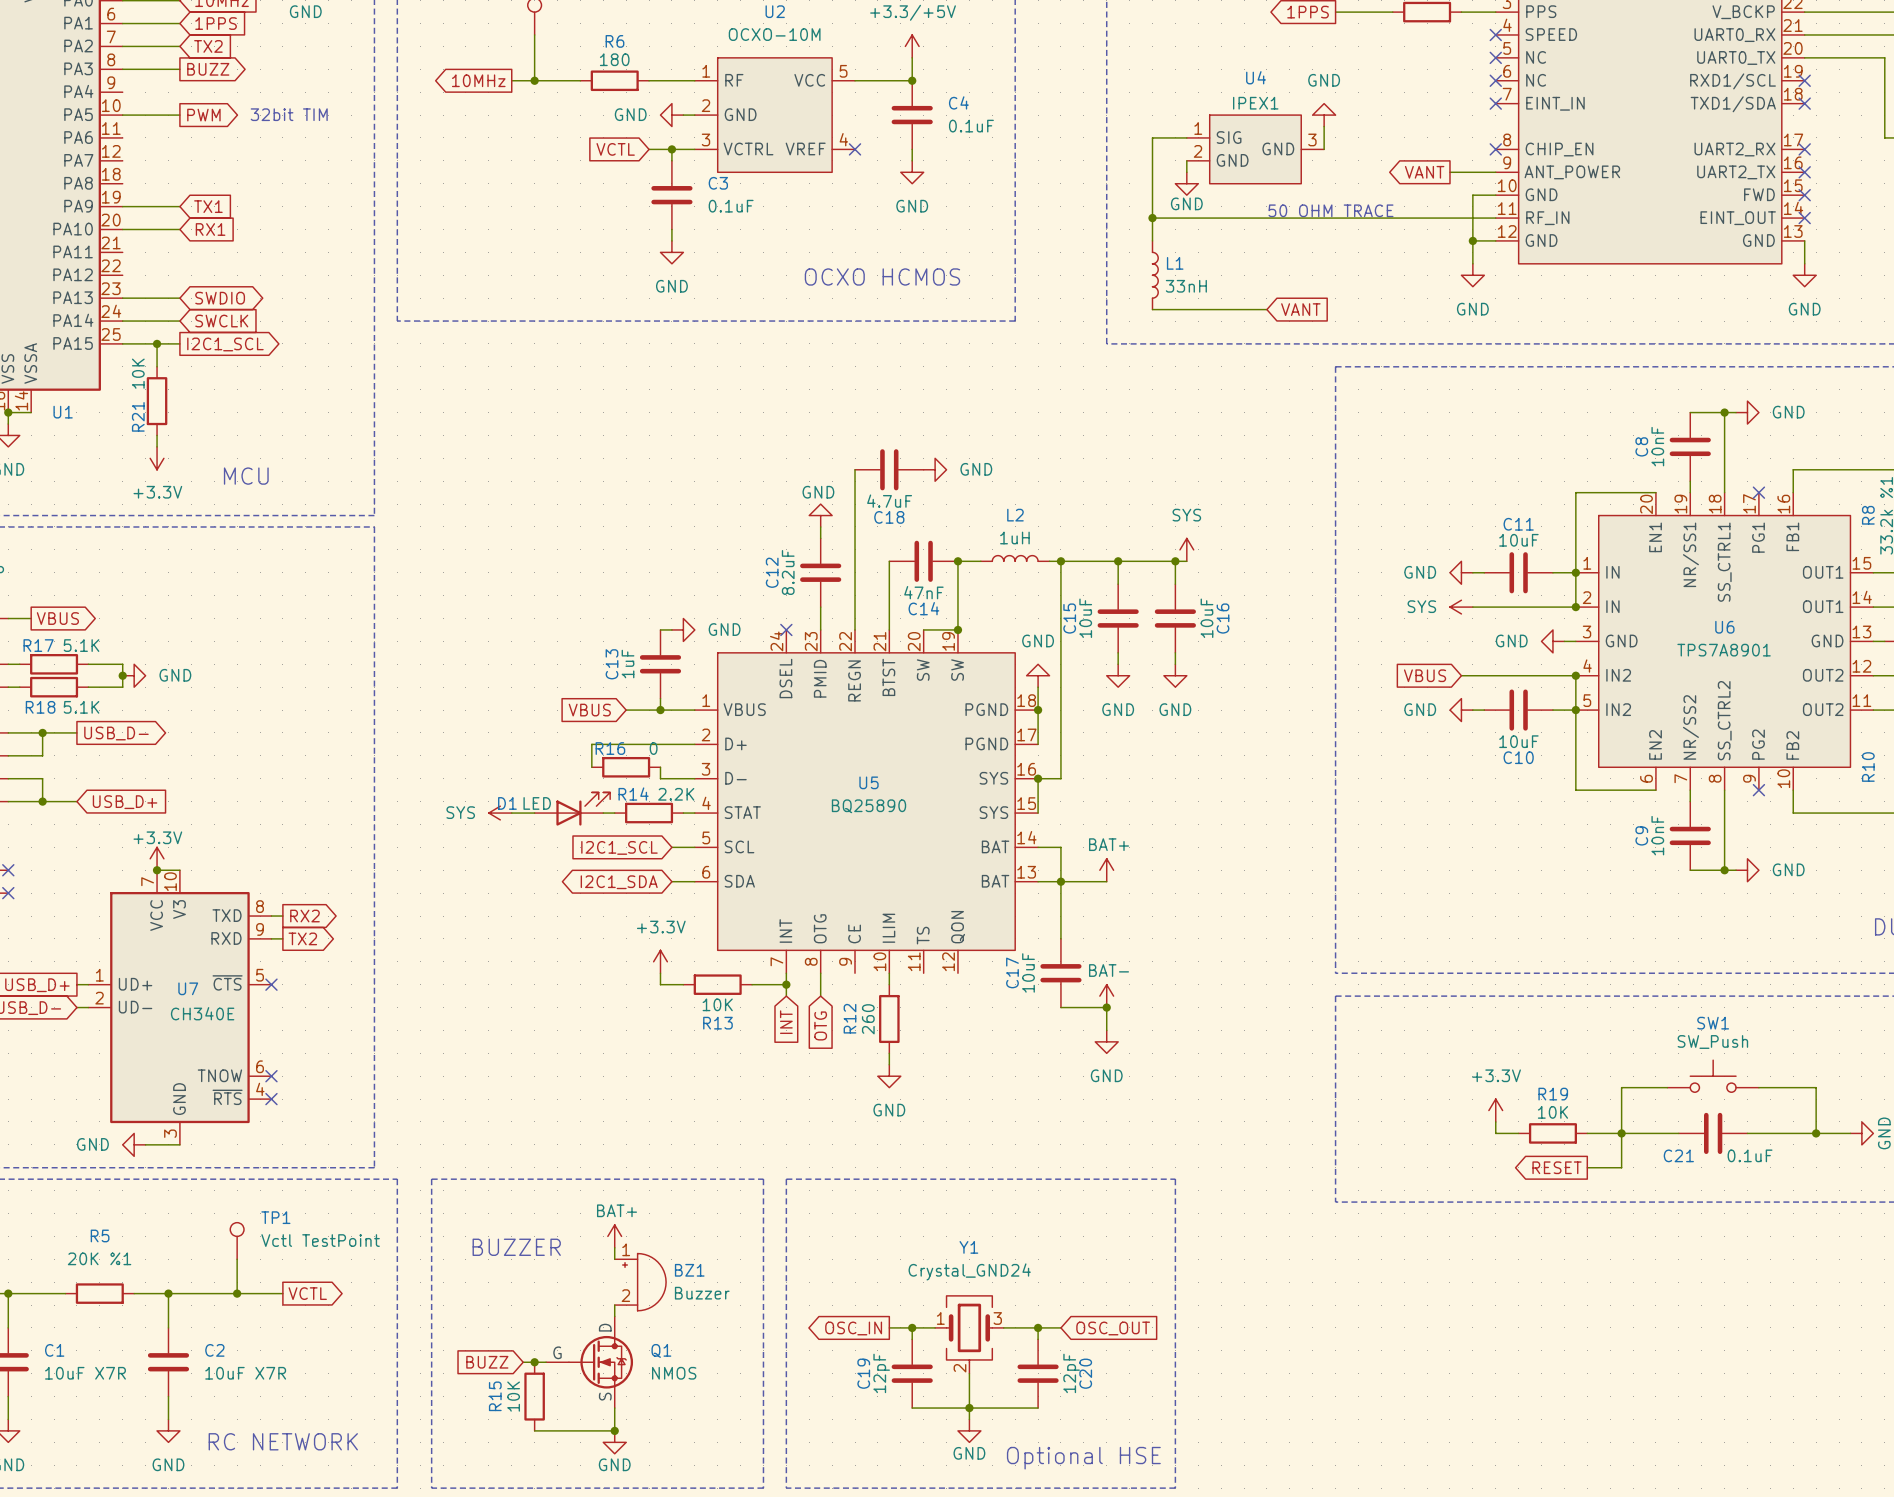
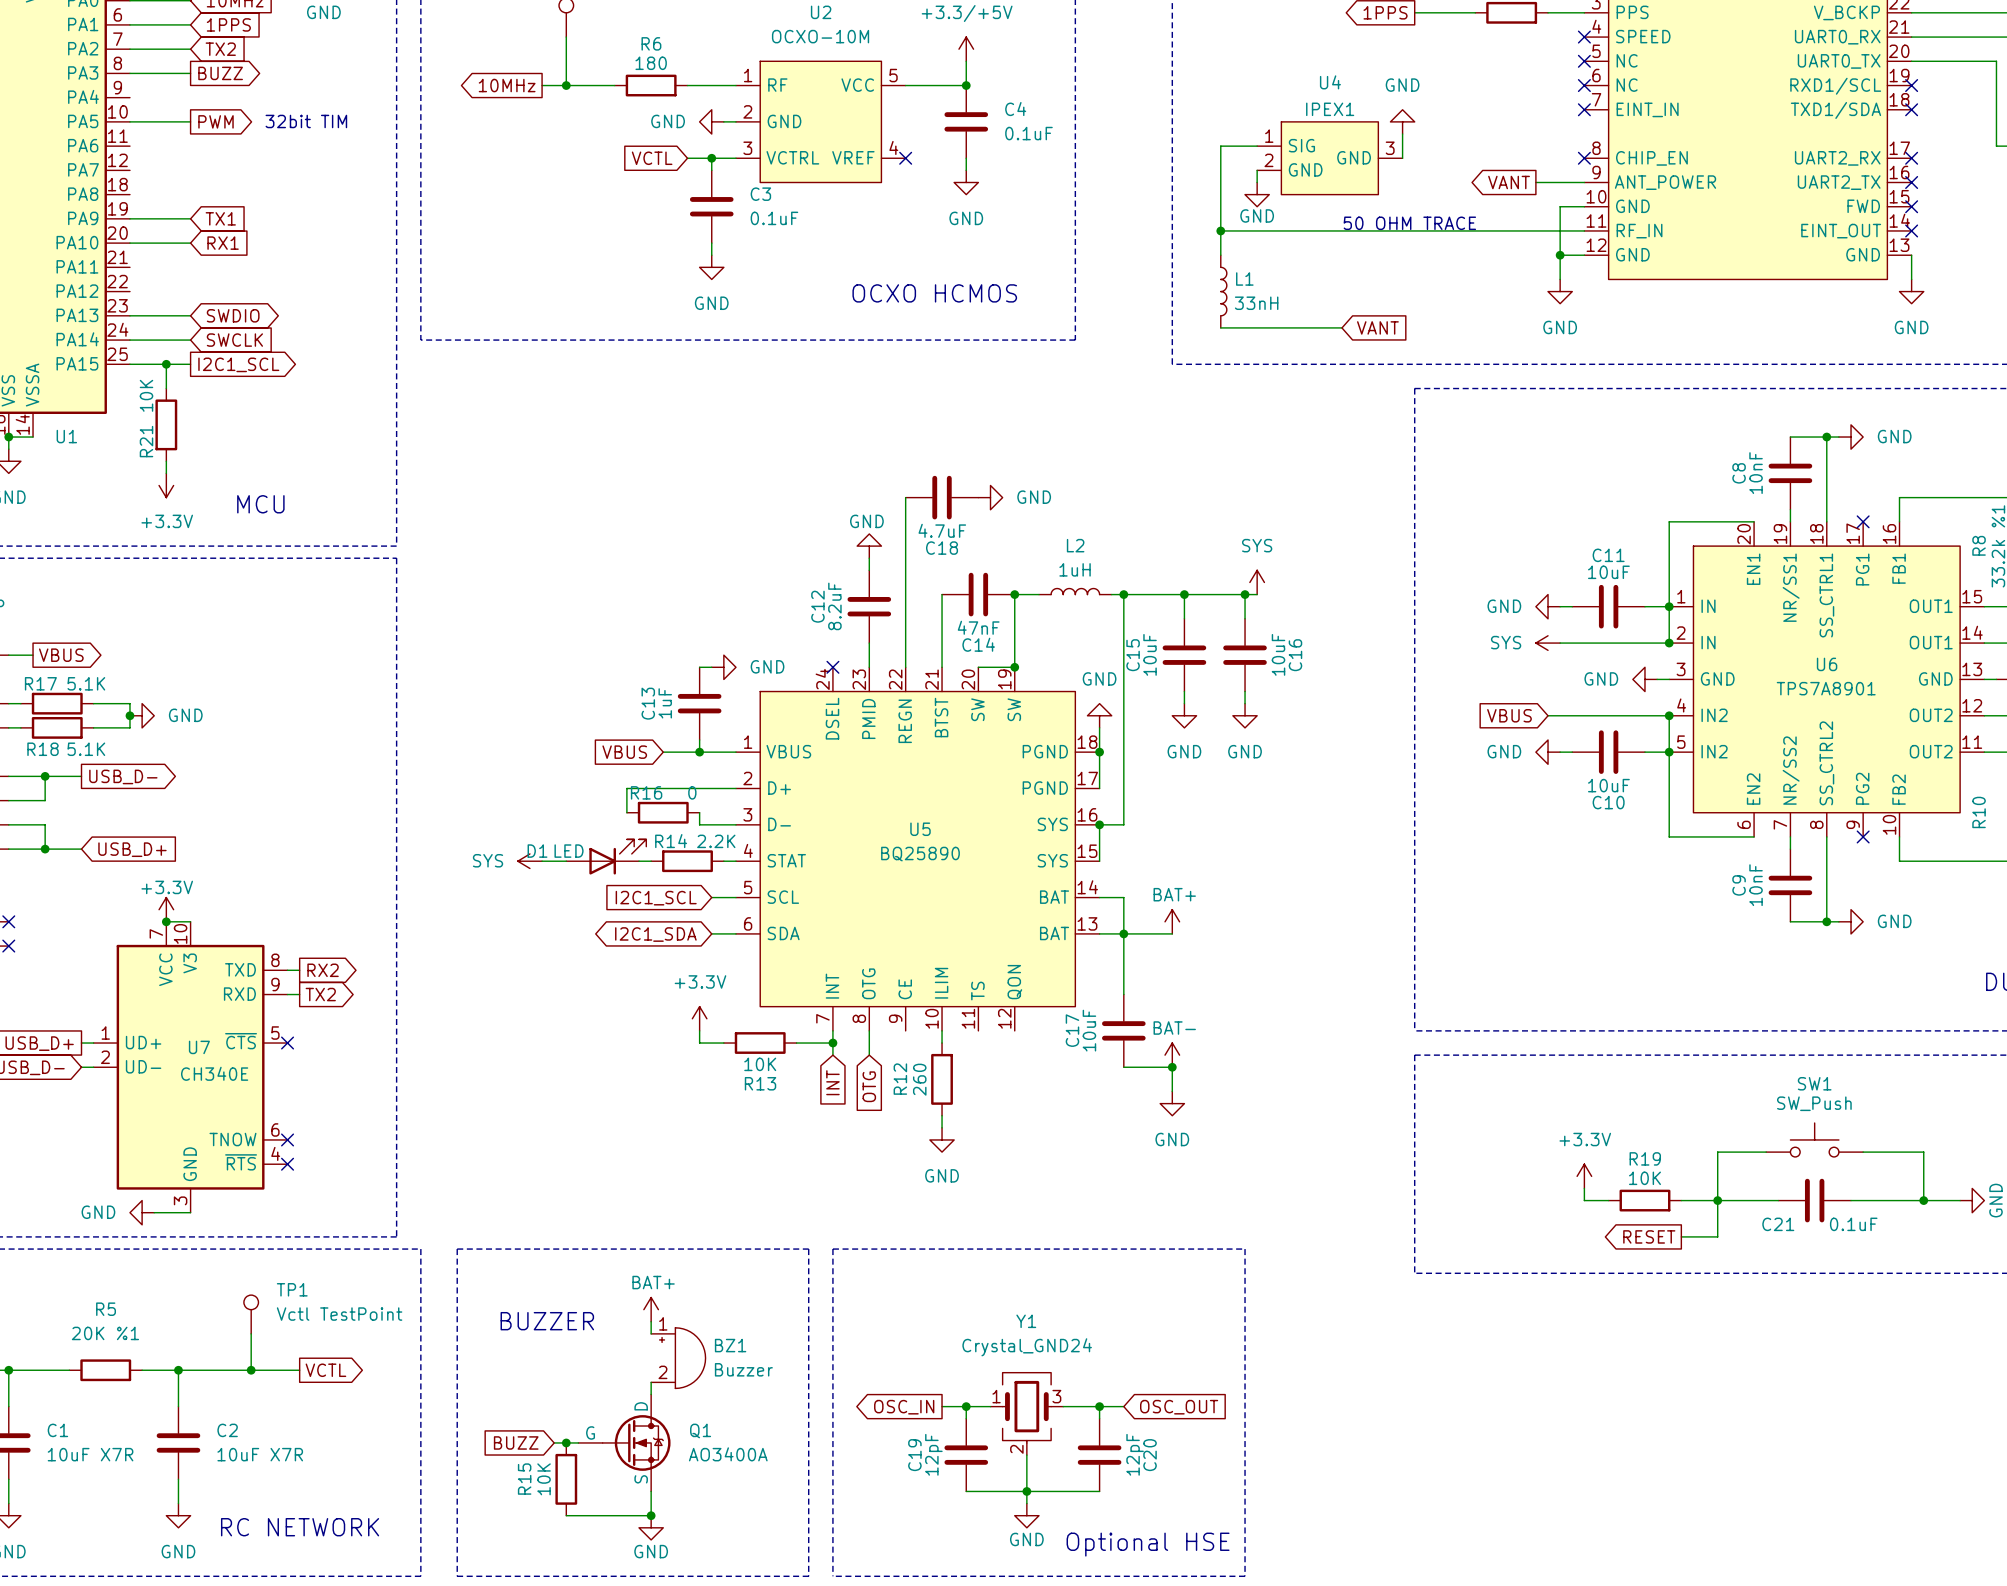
Q1 value: NMOS (674, 1373) -> AO3400A (728, 1454)

